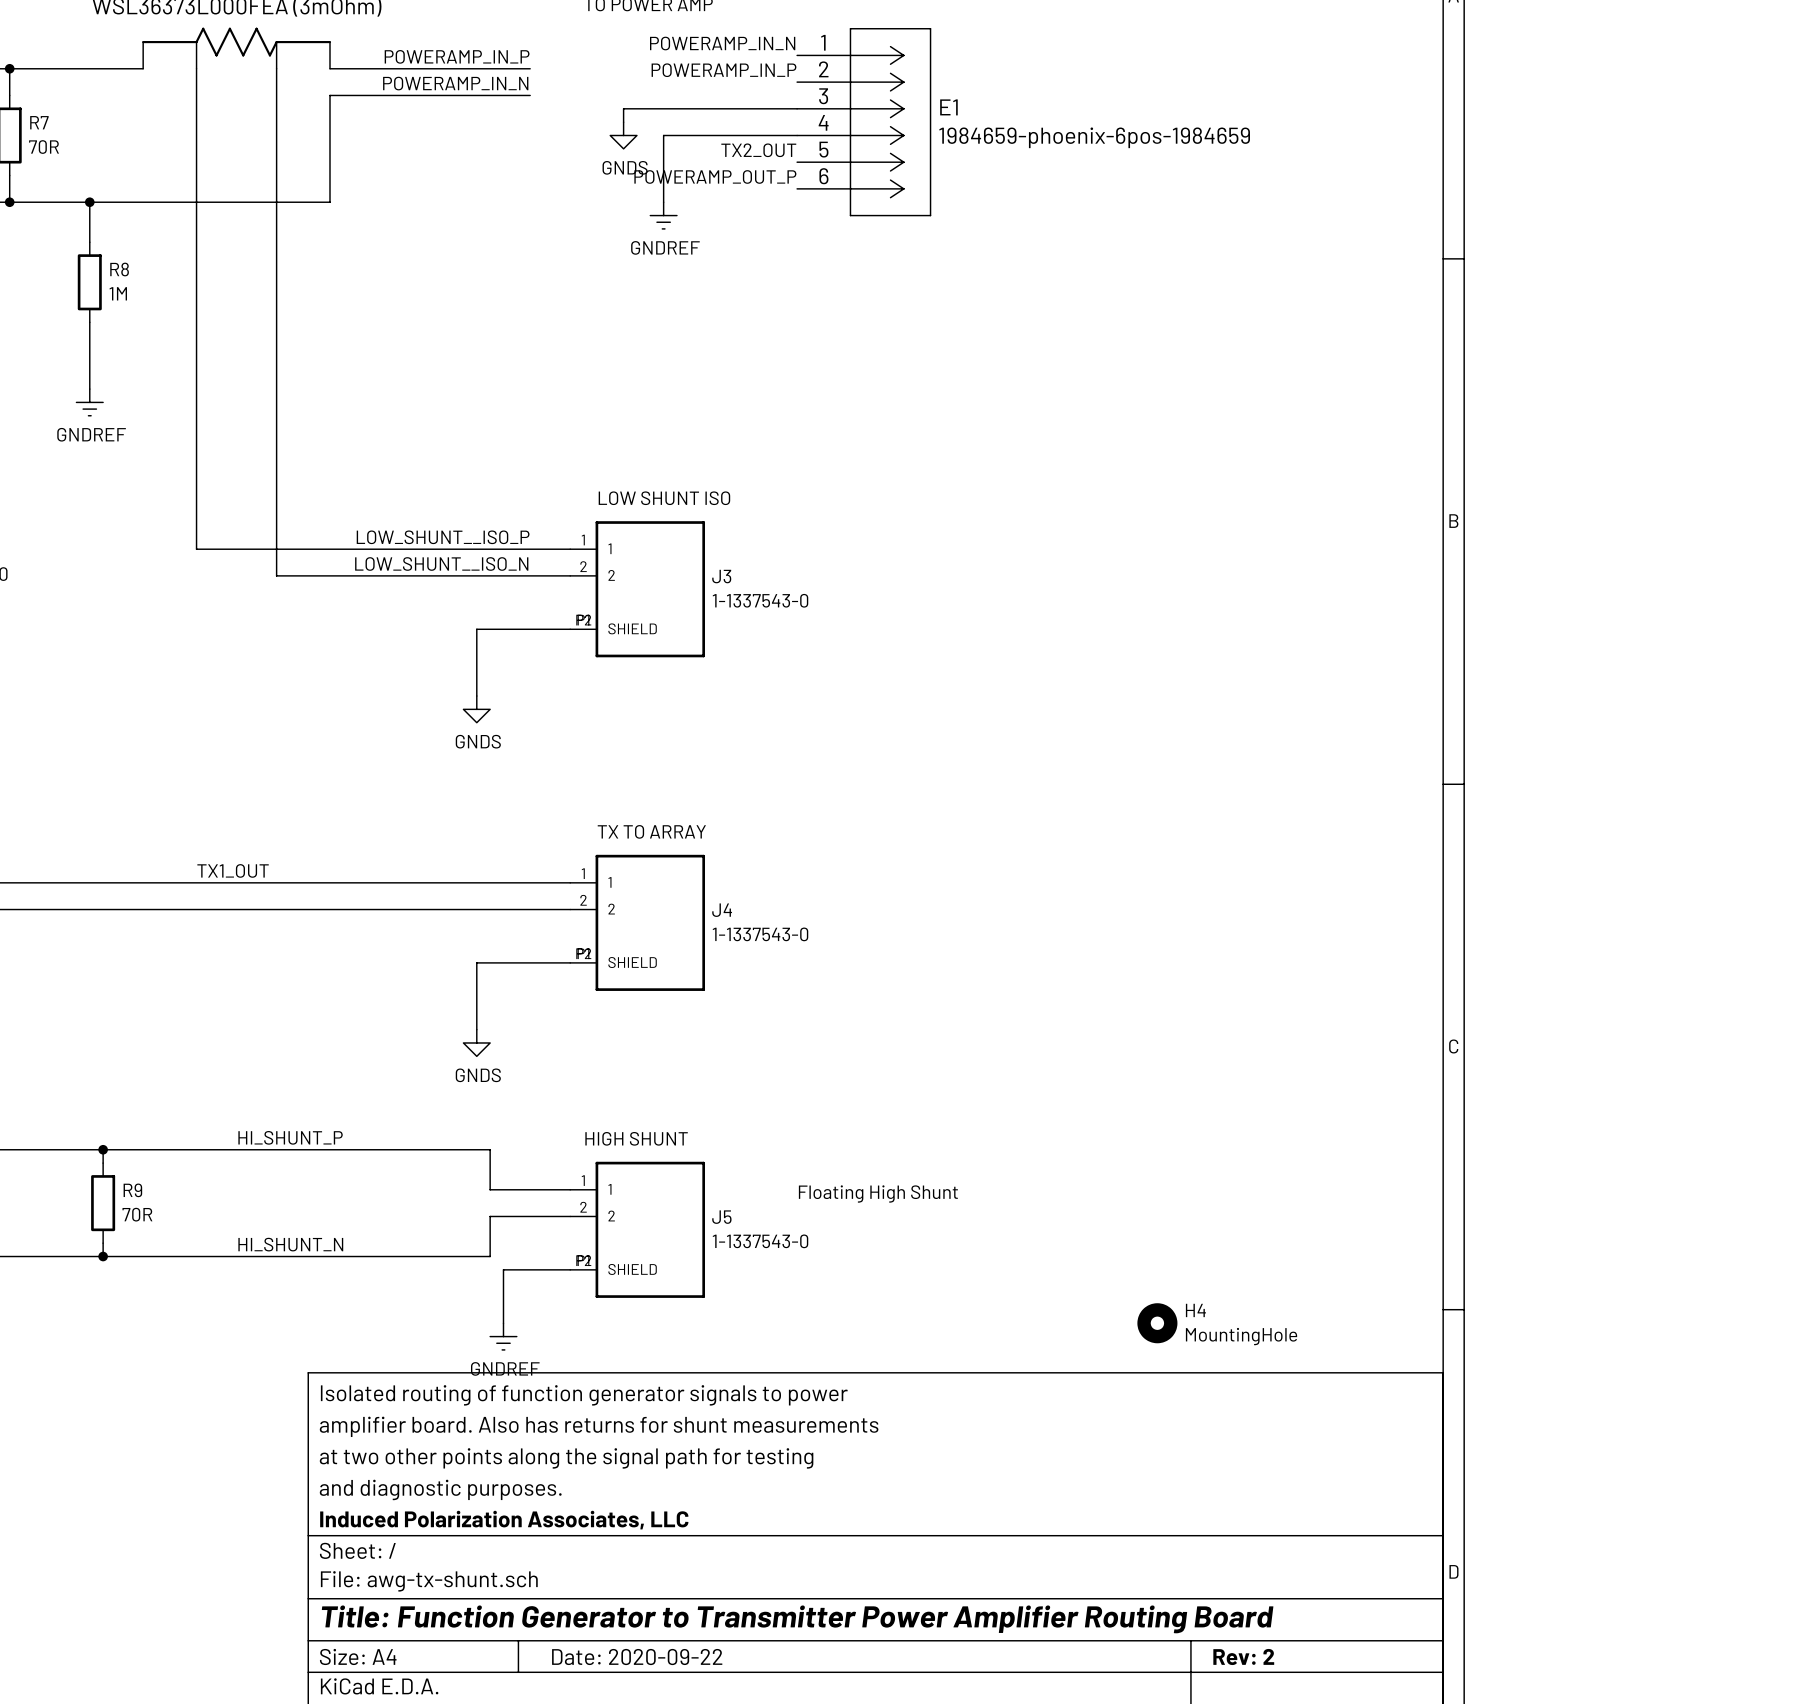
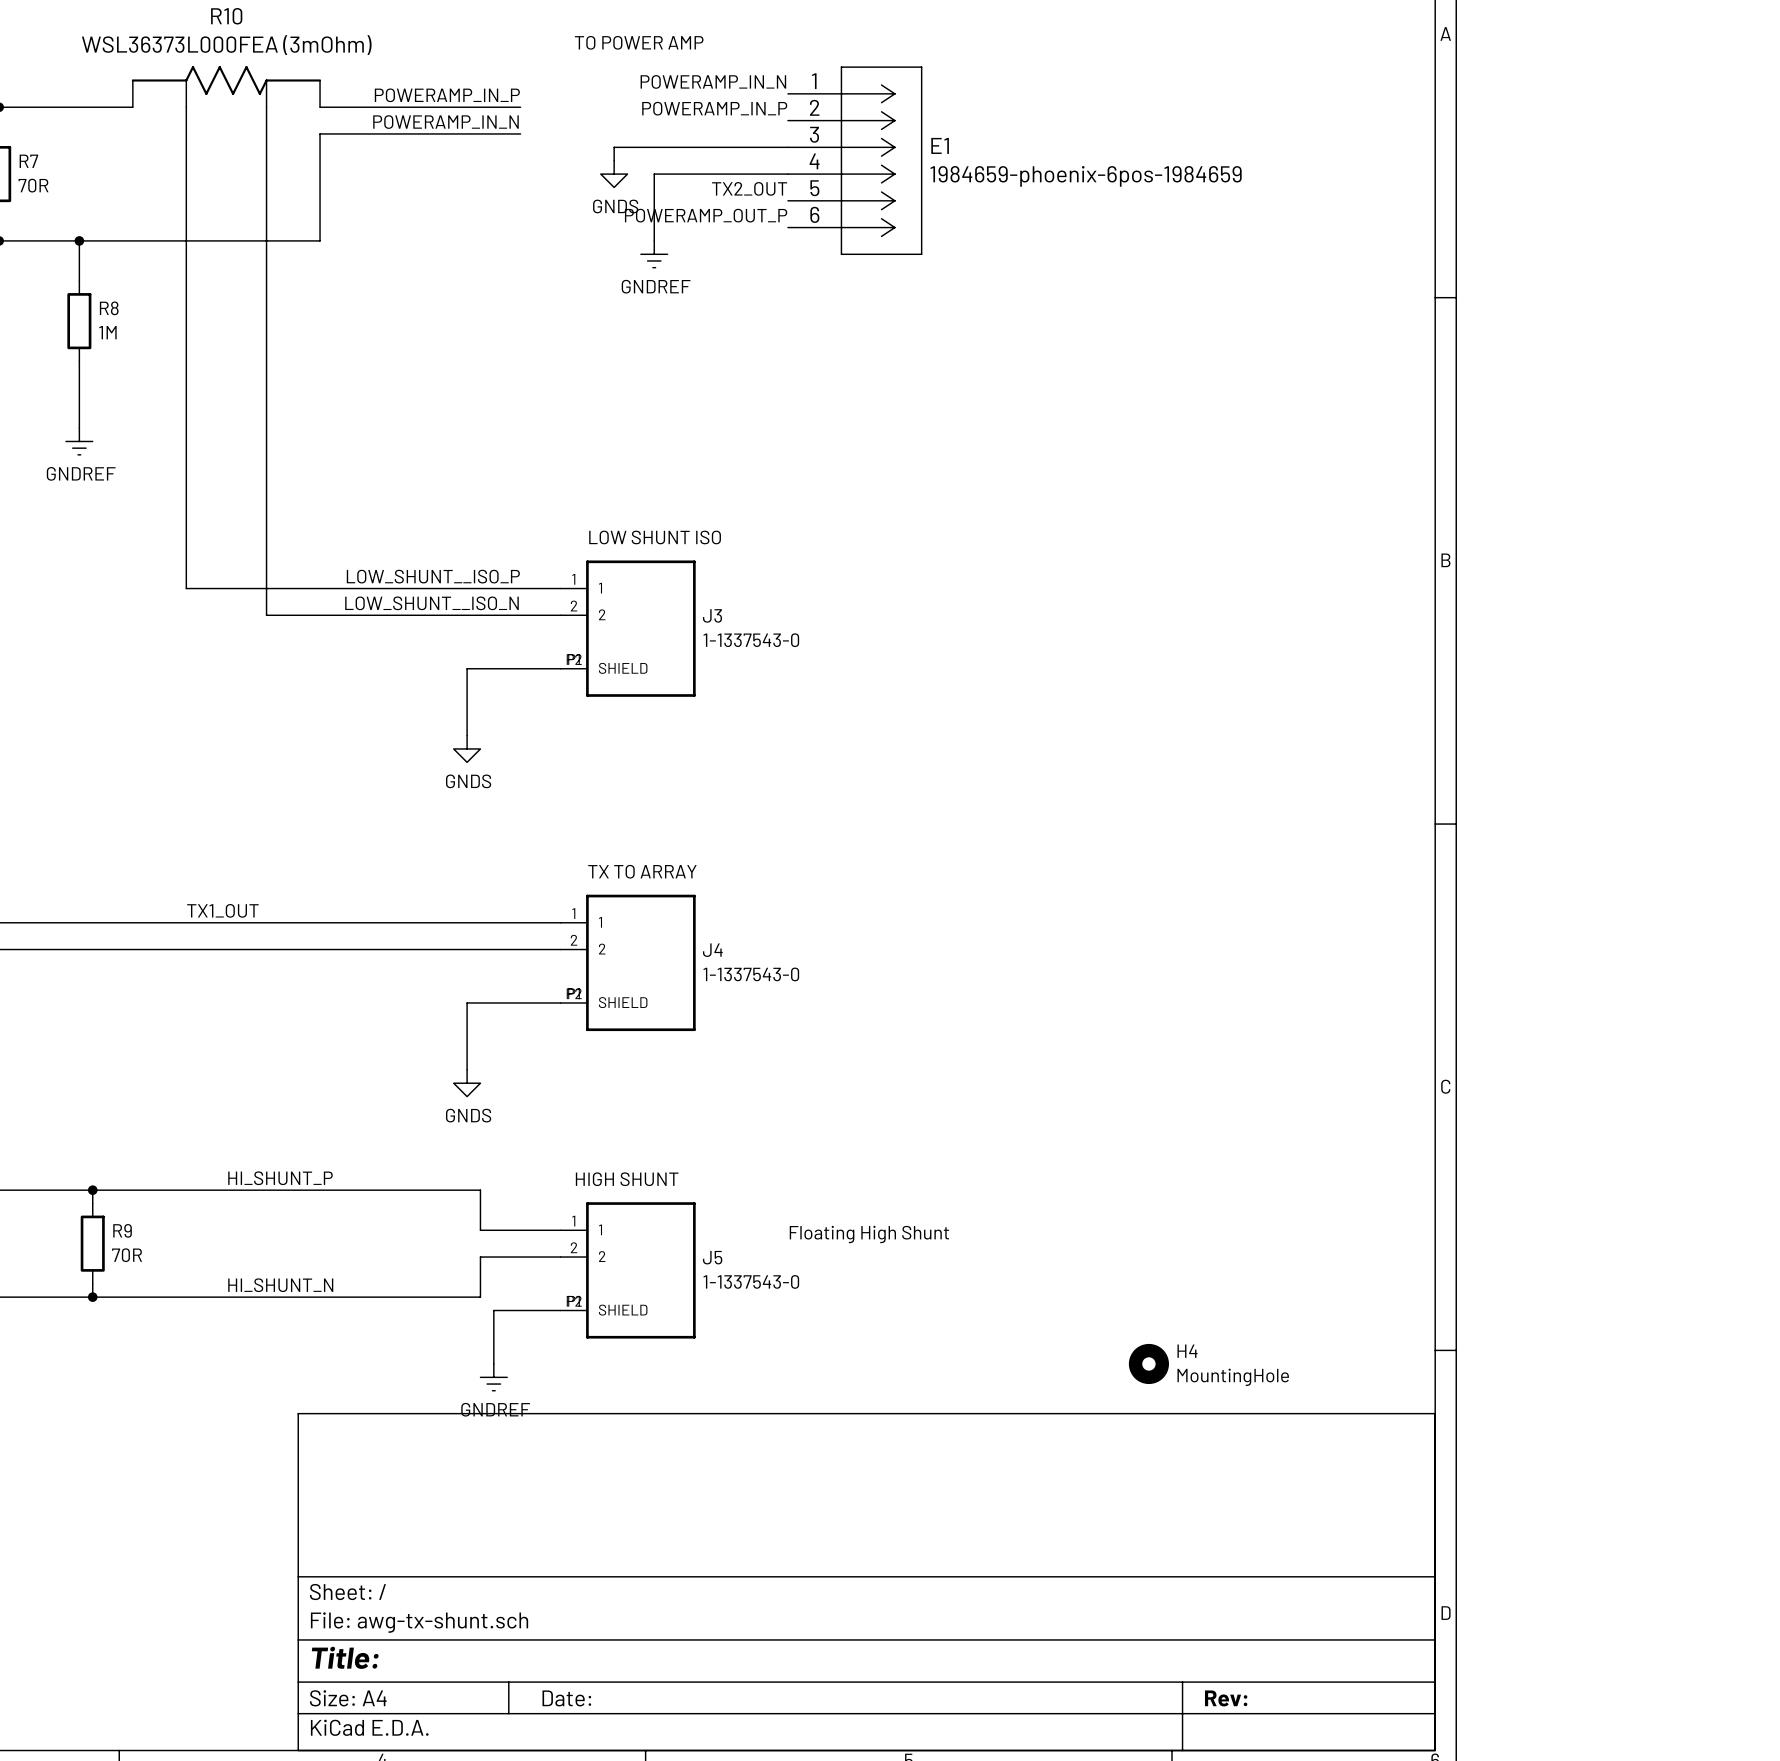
title block: Isolated routing of function generator signals to power (584, 1395) -> none
title block: amplifier board. Also has returns for shunt measurements (599, 1426) -> none
title block: at two other points along the signal path for testing (566, 1458) -> none
title block: and diagnostic purposes. (440, 1489) -> none
title block: Induced Polarization Associates, LLC (504, 1520) -> none
title block: Title: Function Generator to Transmitter Power Amplifier Routing Board (797, 1619) -> Title: (345, 1657)
title block: Date: 2020-09-22 (637, 1657) -> Date: (566, 1698)
title block: Rev: 2 (1243, 1657) -> Rev: (1226, 1698)

